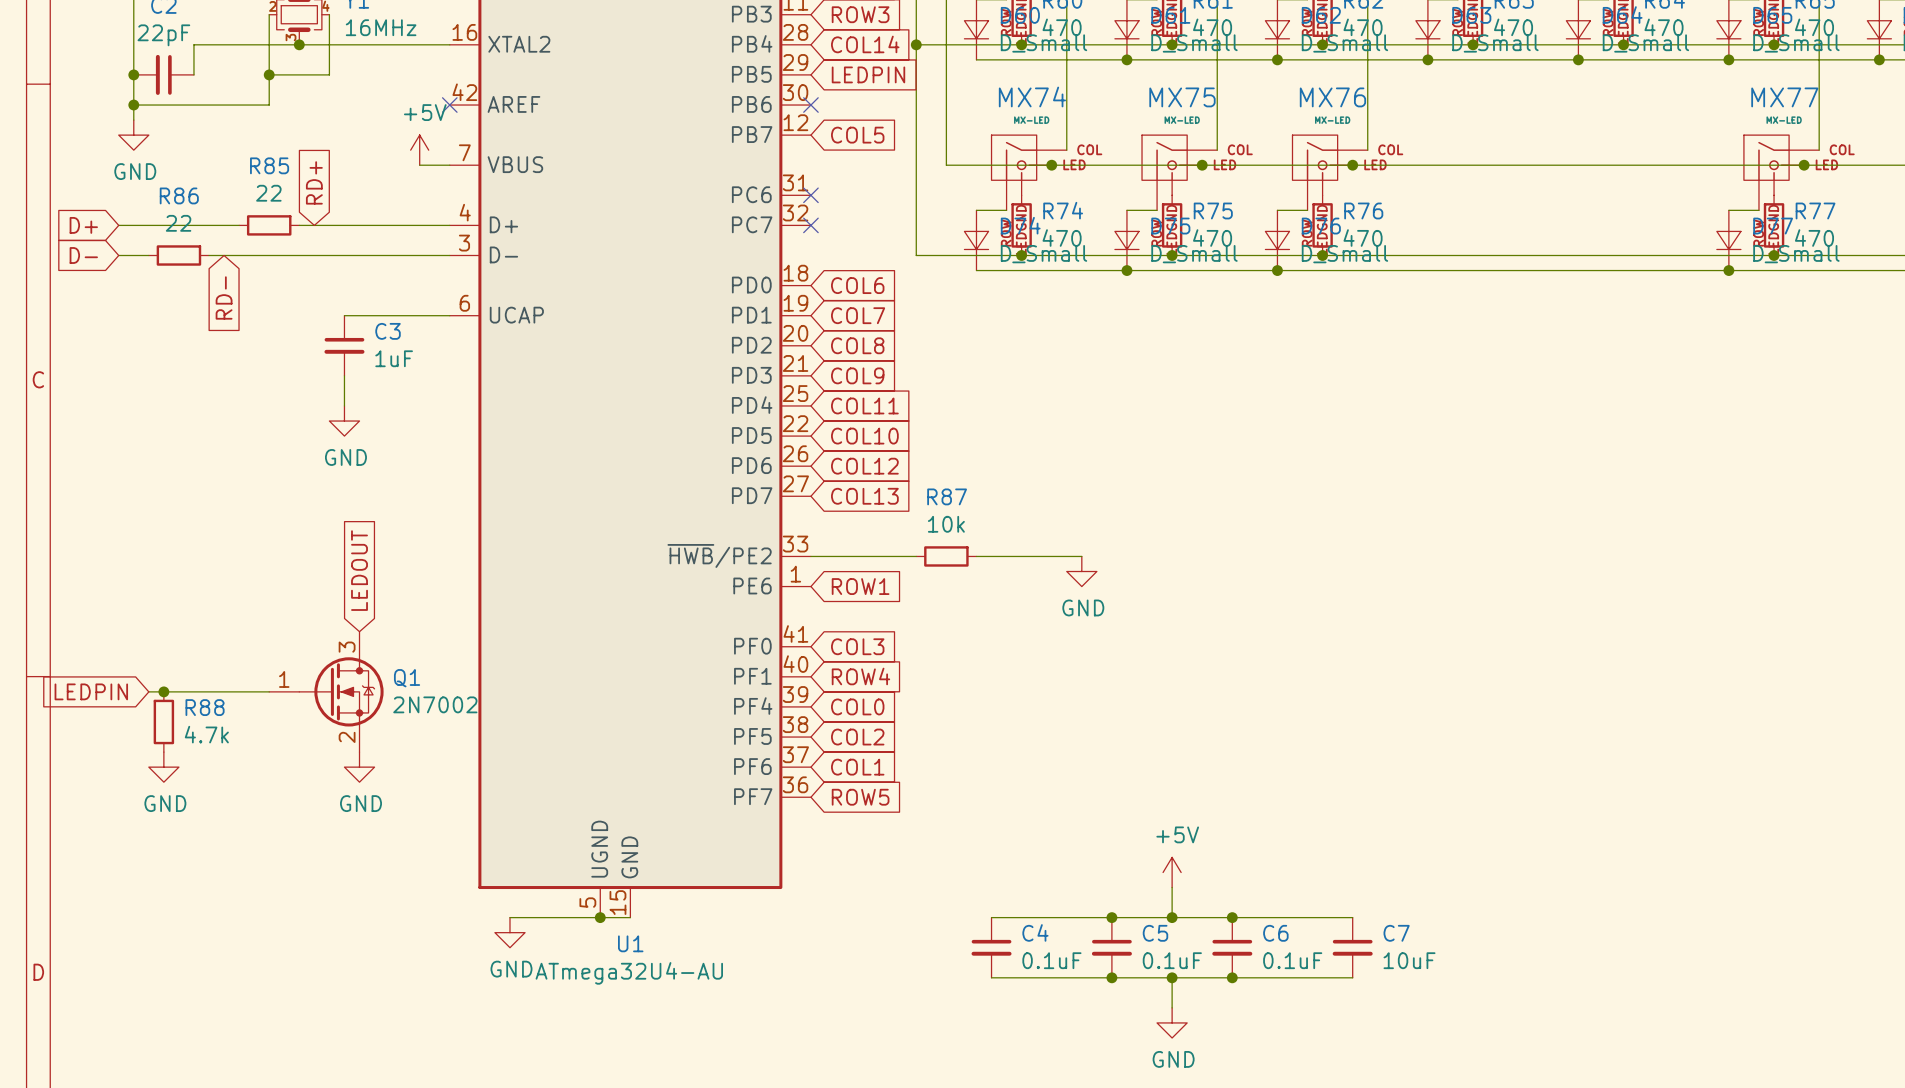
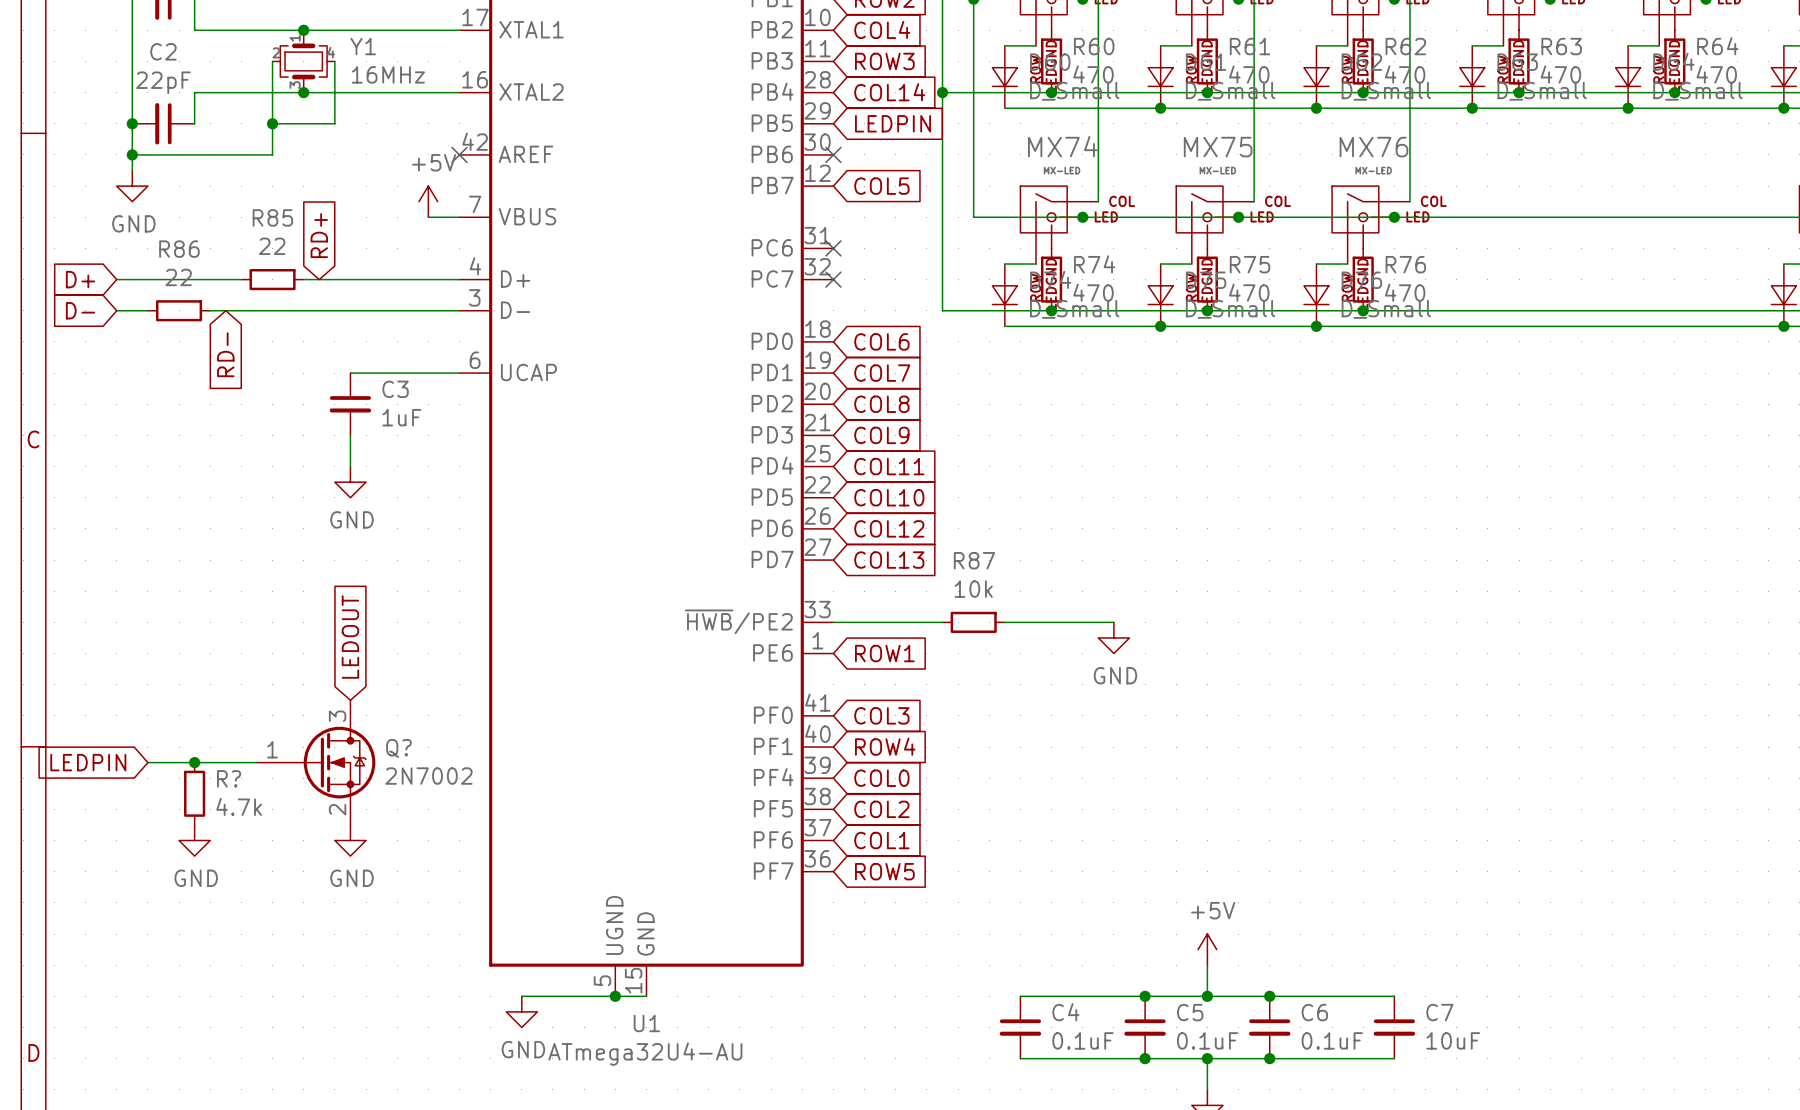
global label position: LEDOUT (359, 570) -> LEDOUT (350, 637)
junction position: (163, 691) -> (194, 762)
Q?: none -> 2N7002 (316, 762)
Q1: 2N7002 (326, 691) -> none
R88: 4.7k (163, 721) -> none
R?: none -> 4.7k (194, 793)
power symbol position: GND (163, 767) -> GND (194, 840)
power symbol position: GND (359, 767) -> GND (350, 840)

